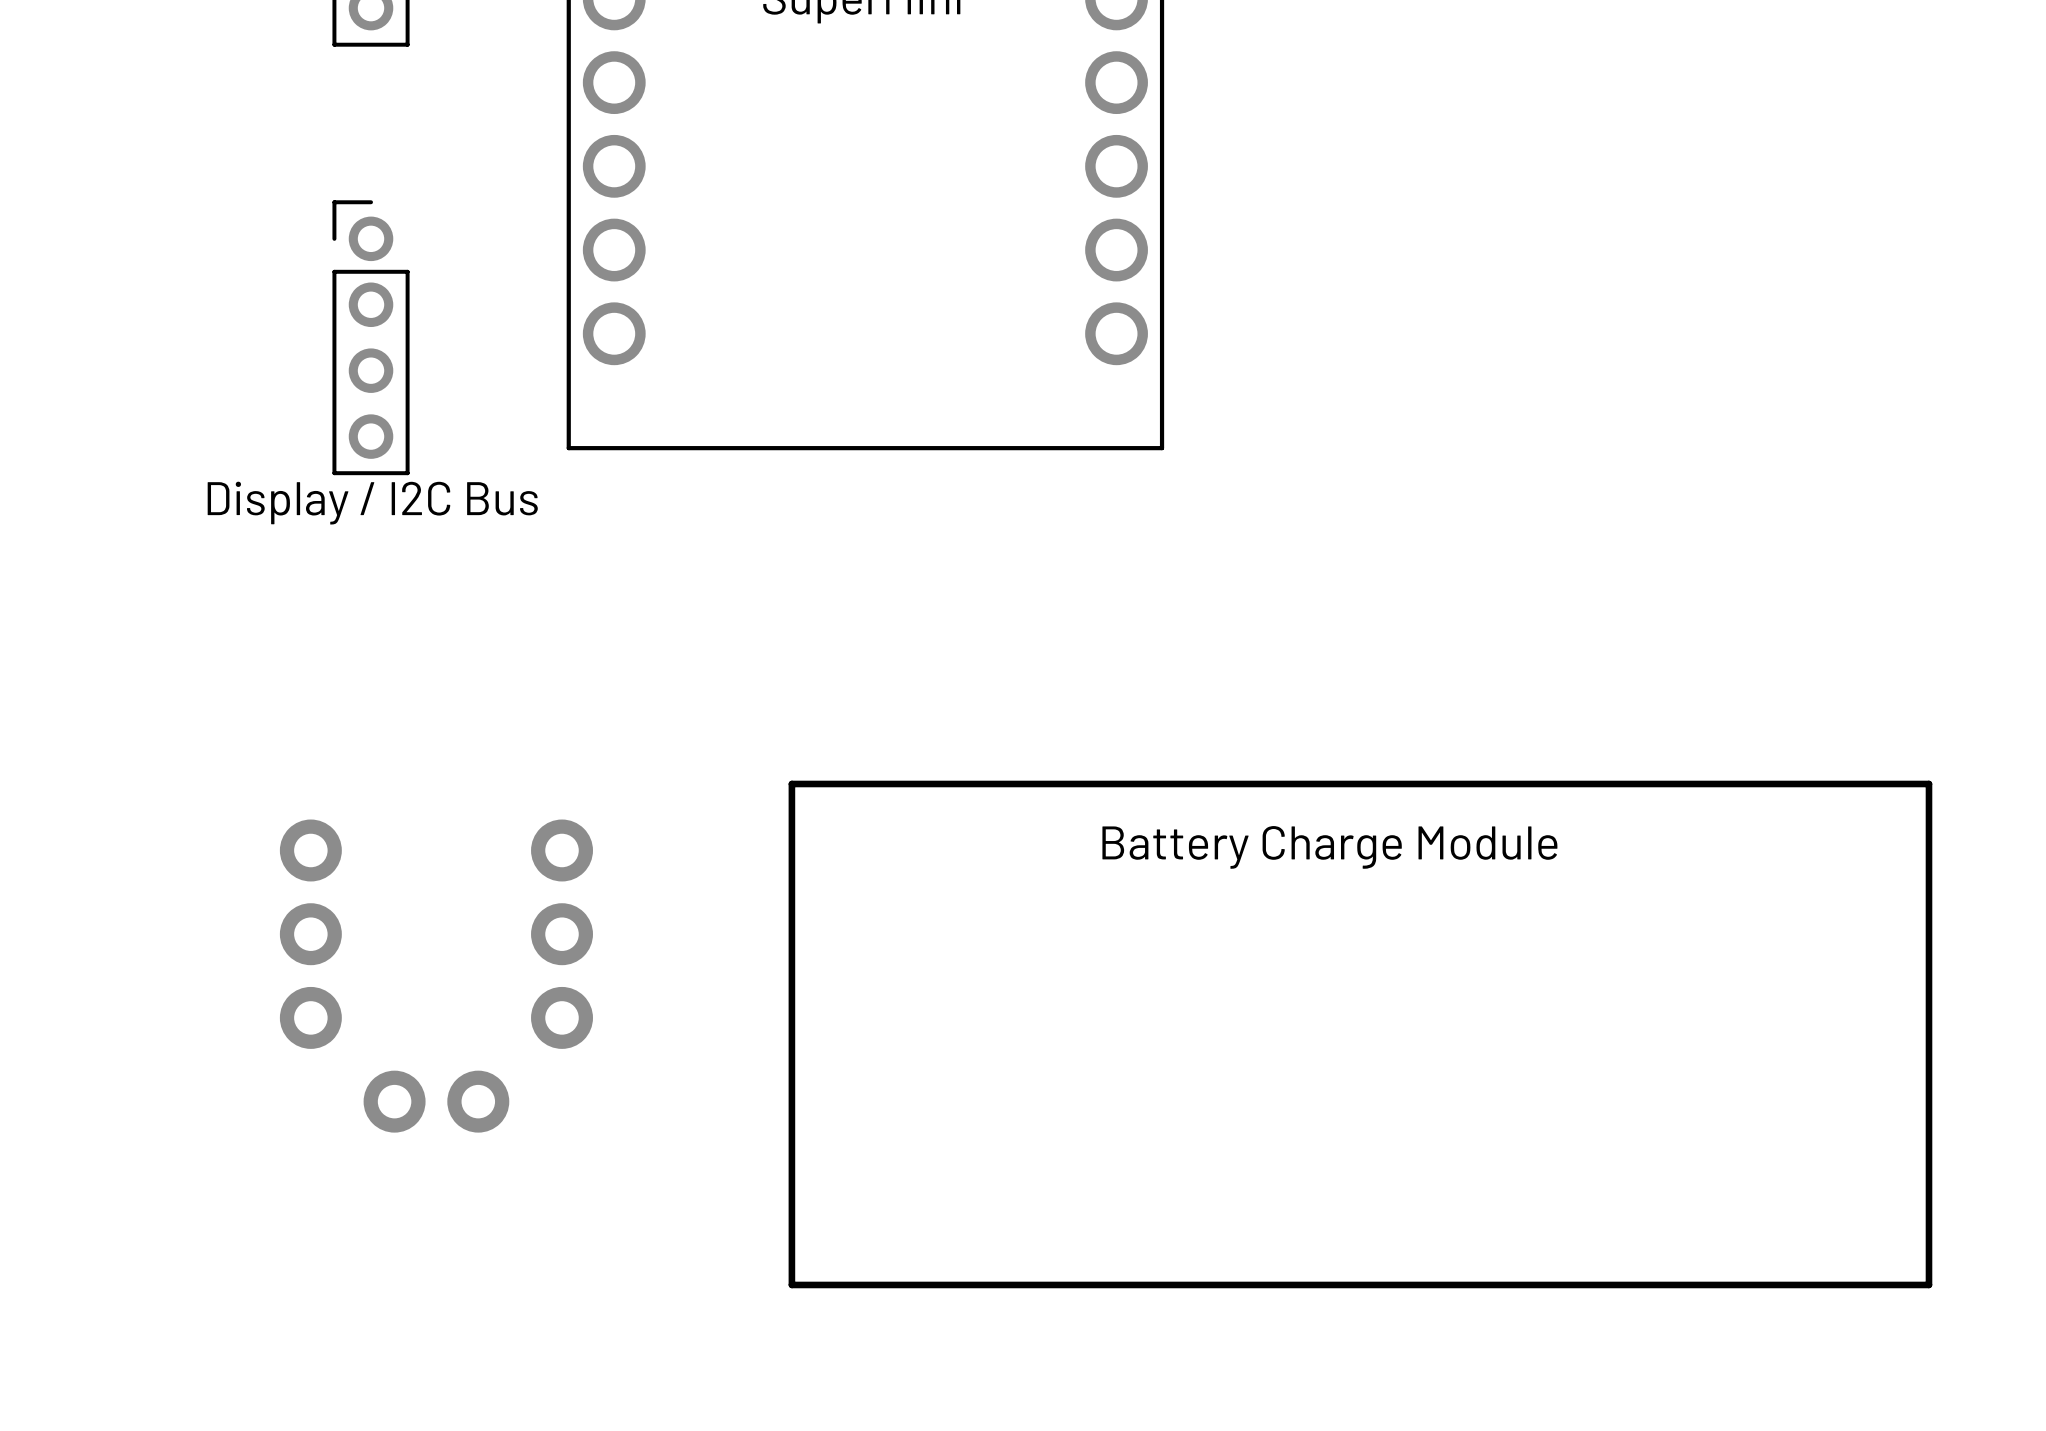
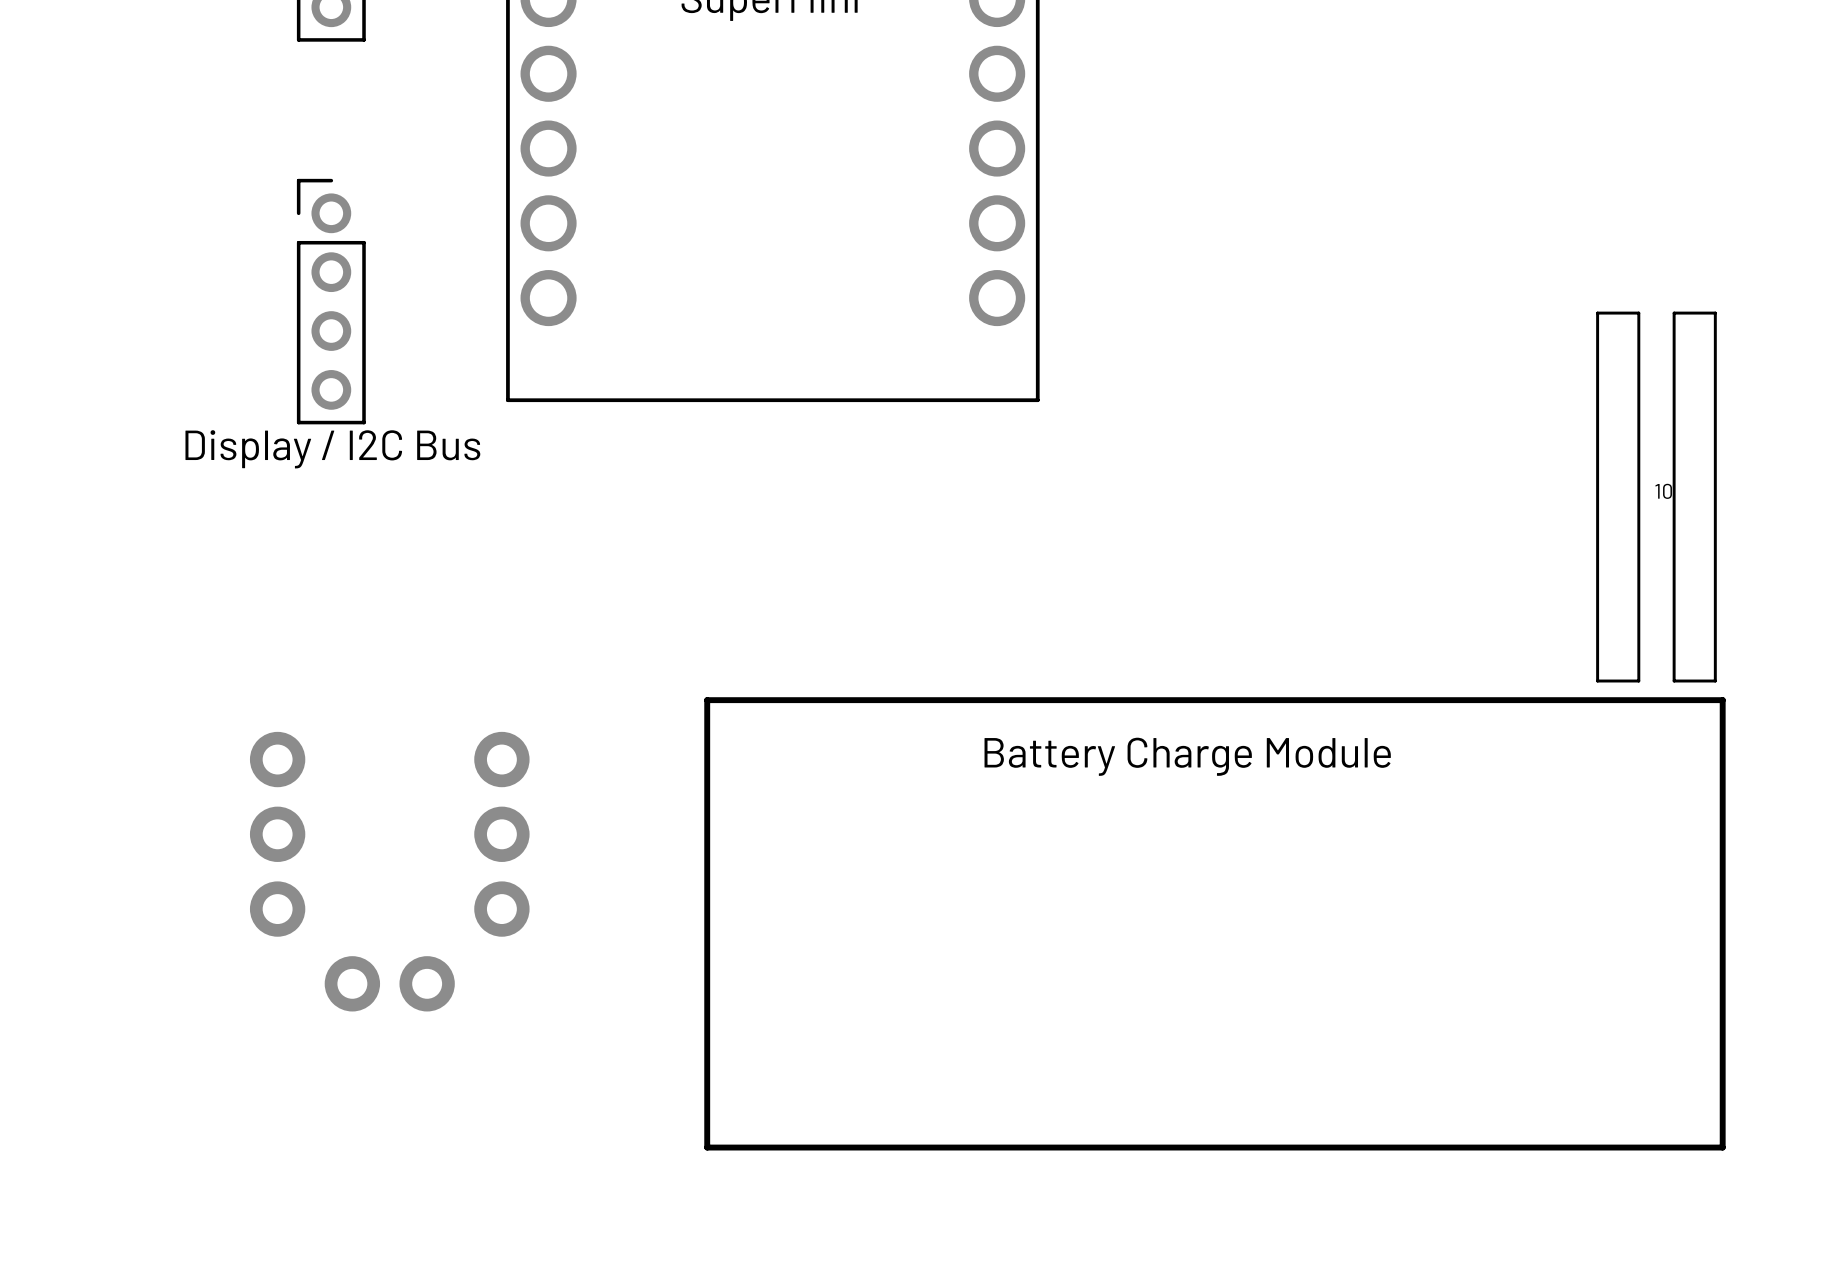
line: none -> (1597, 313) (1638, 313) (1638, 681) (1597, 681) (1597, 313)
line: none -> (1674, 313) (1715, 313) (1715, 681) (1674, 681) (1674, 313)
text: none -> 10 (1663, 491)

